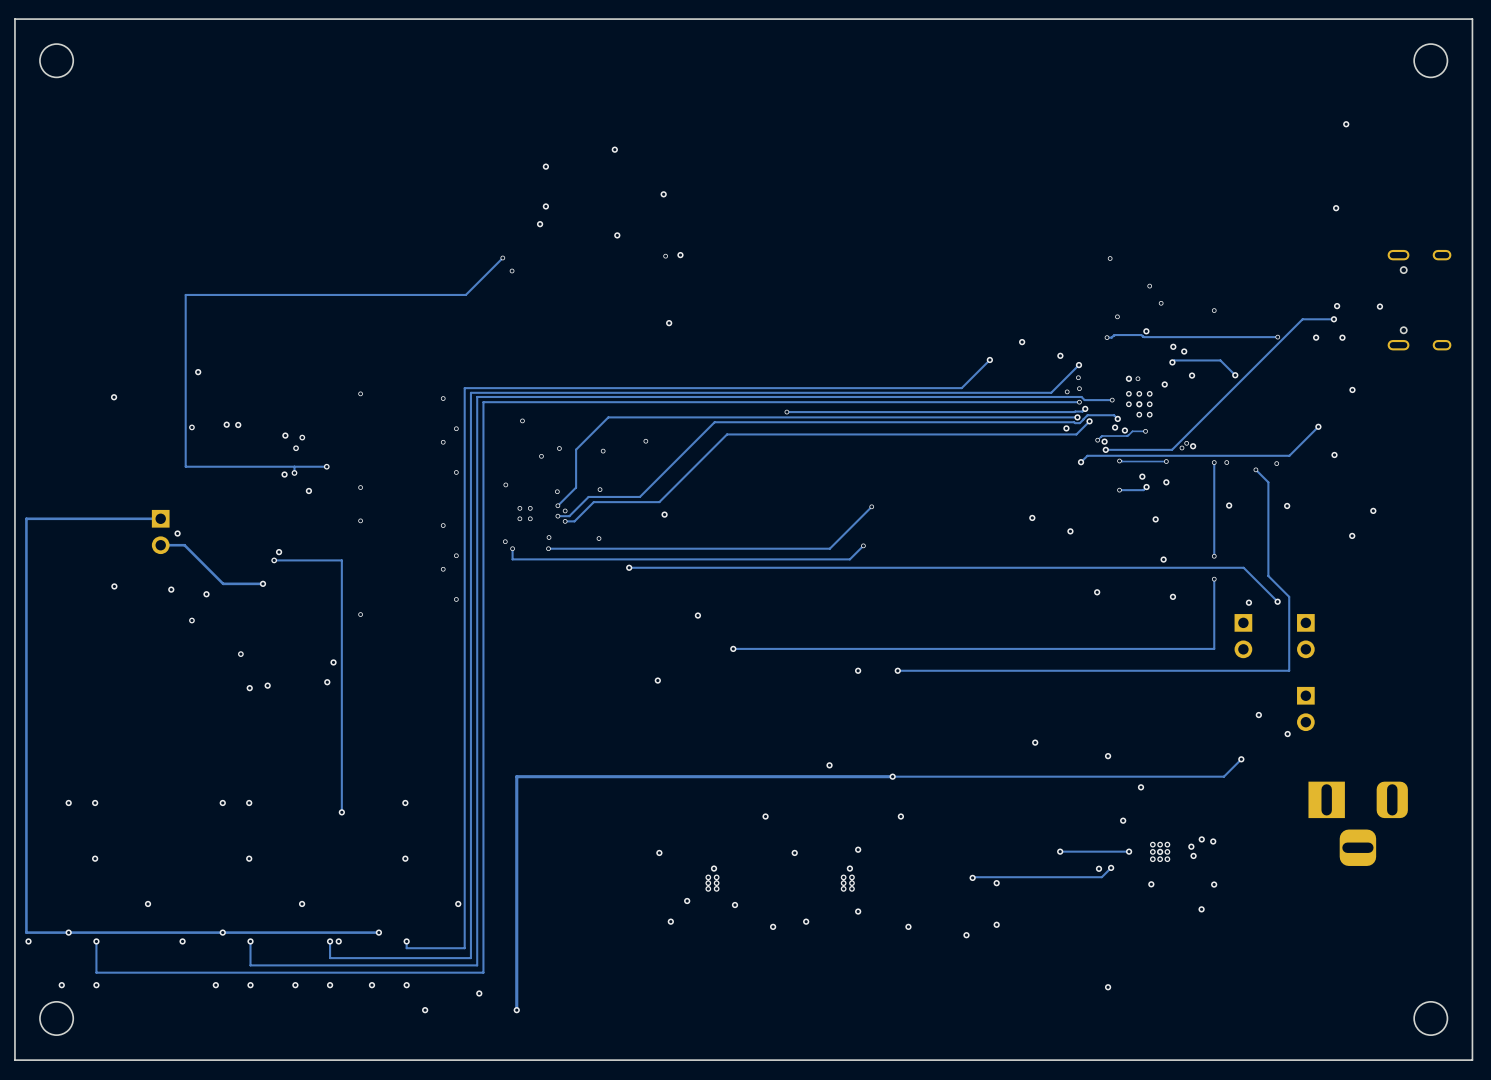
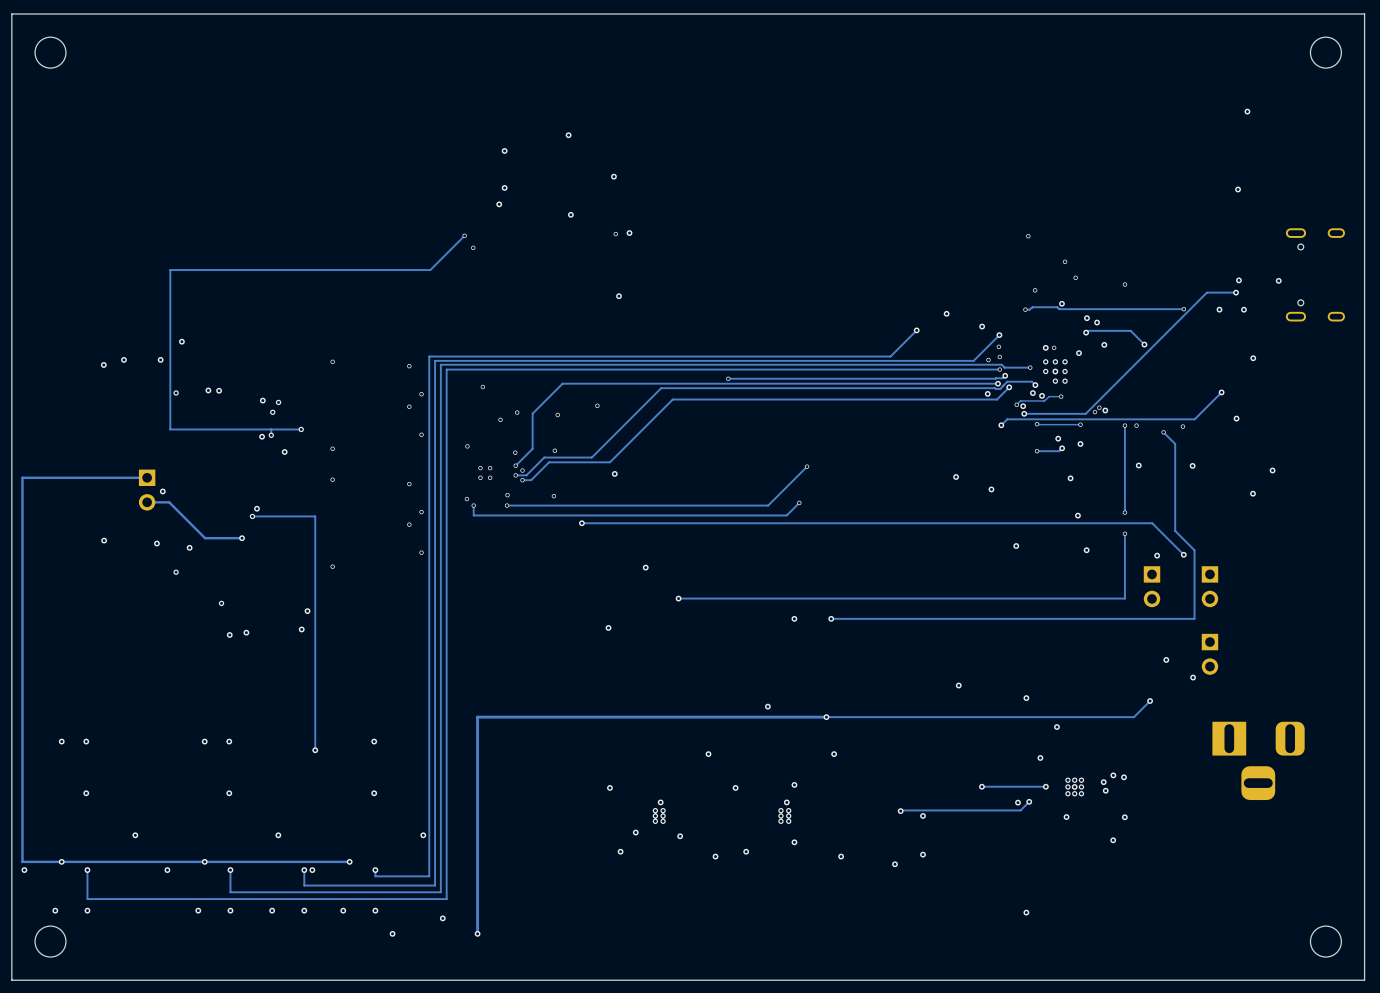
via: none -> (123, 359)
via: none -> (160, 359)

